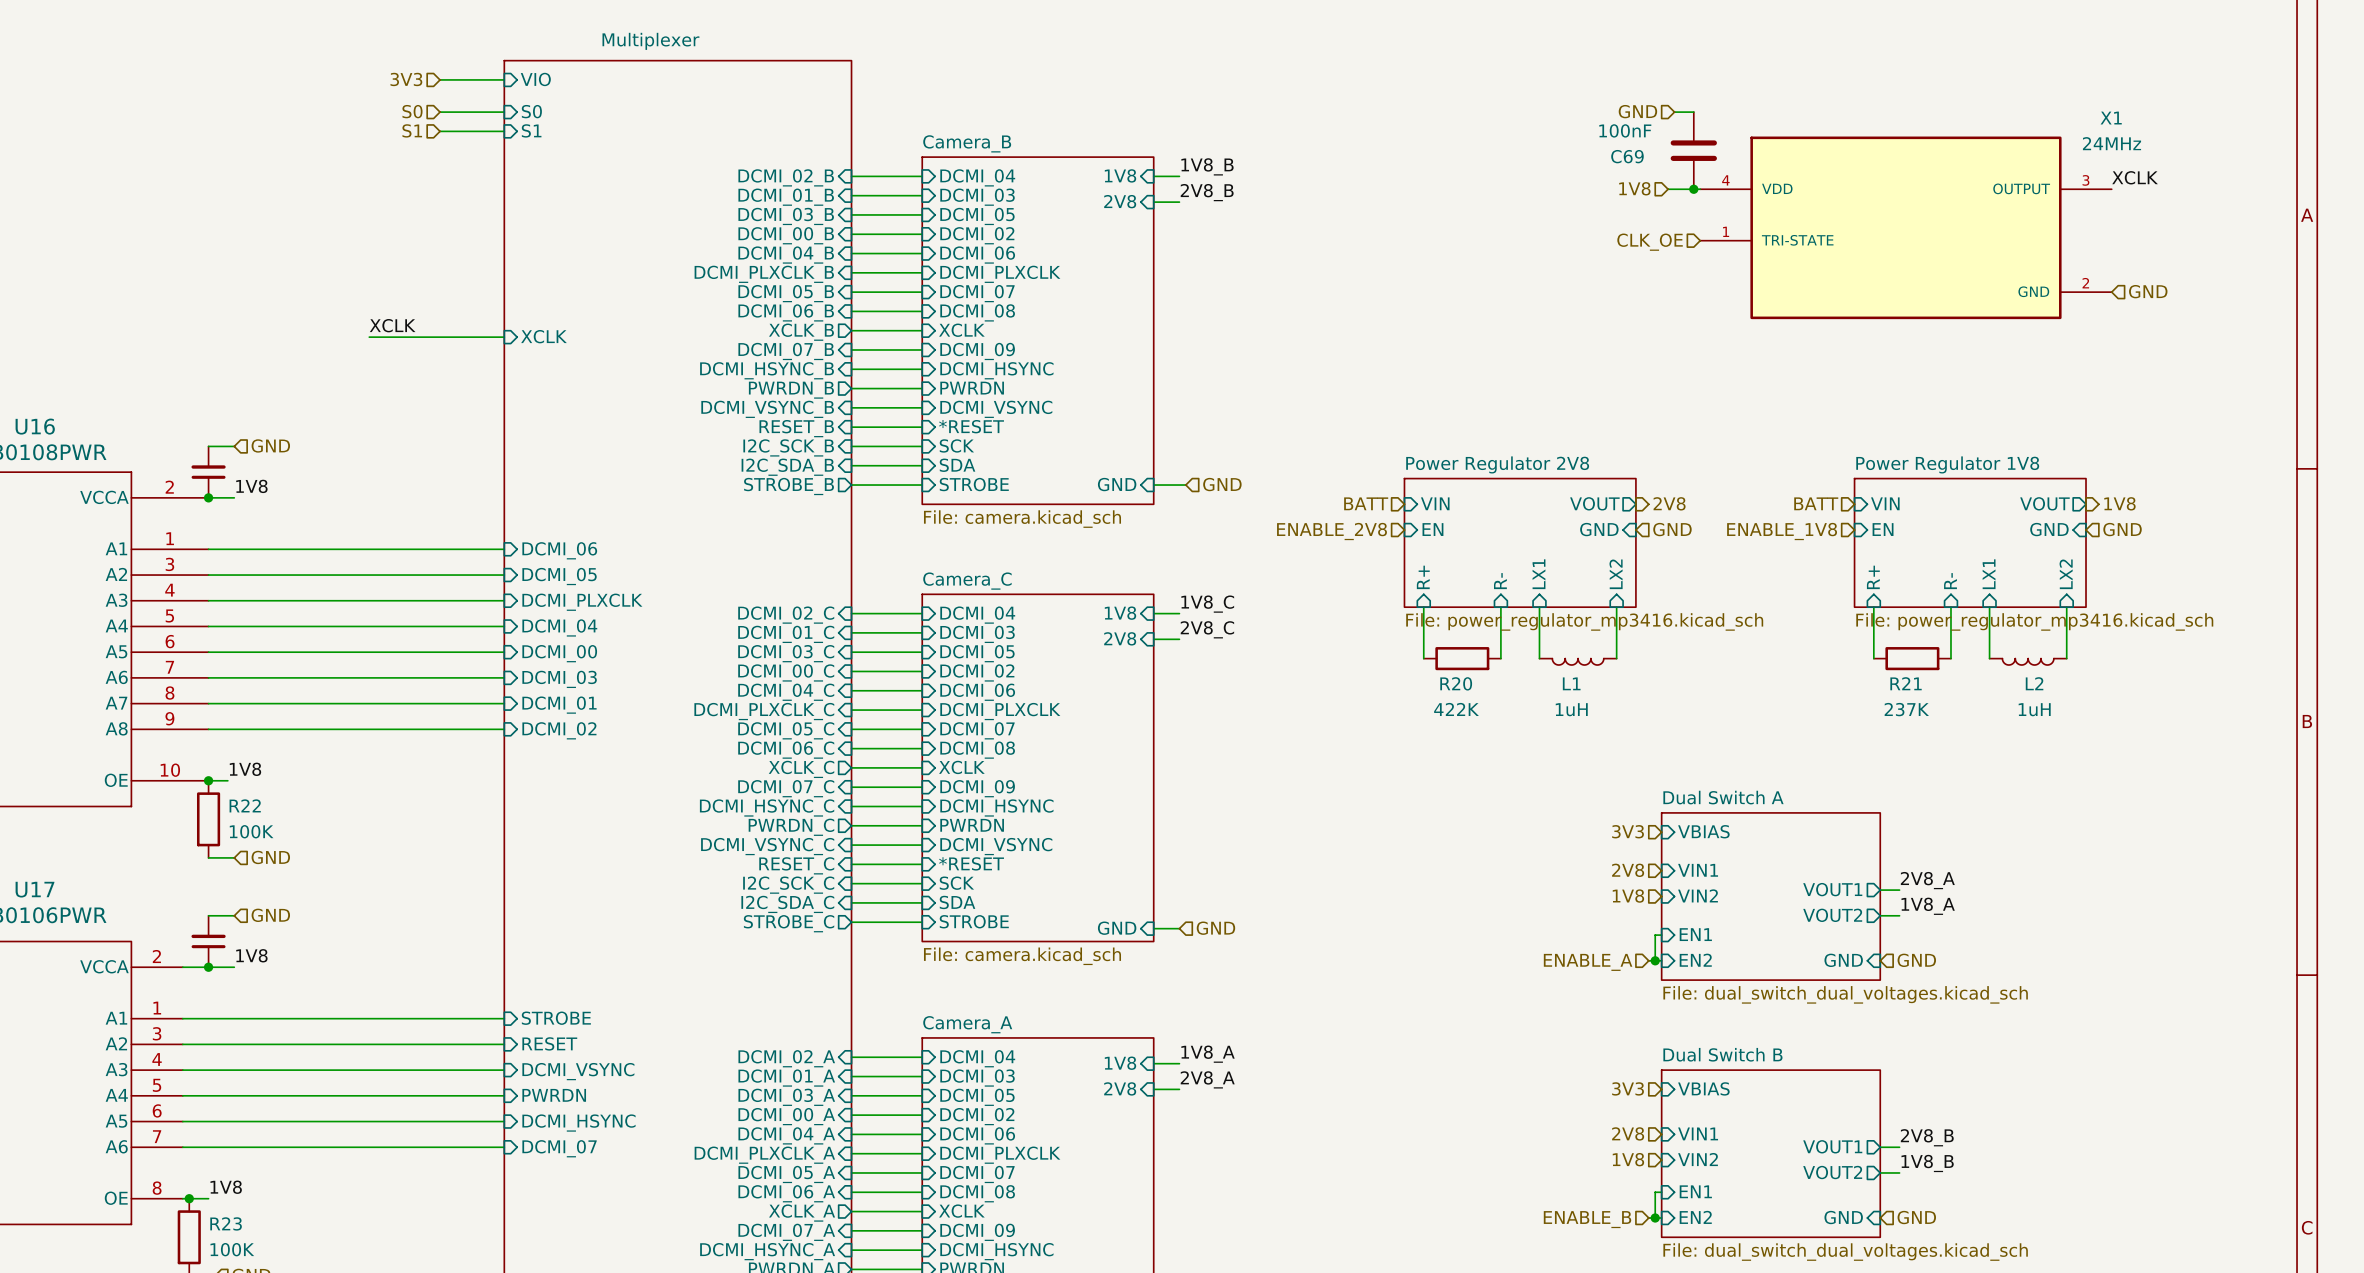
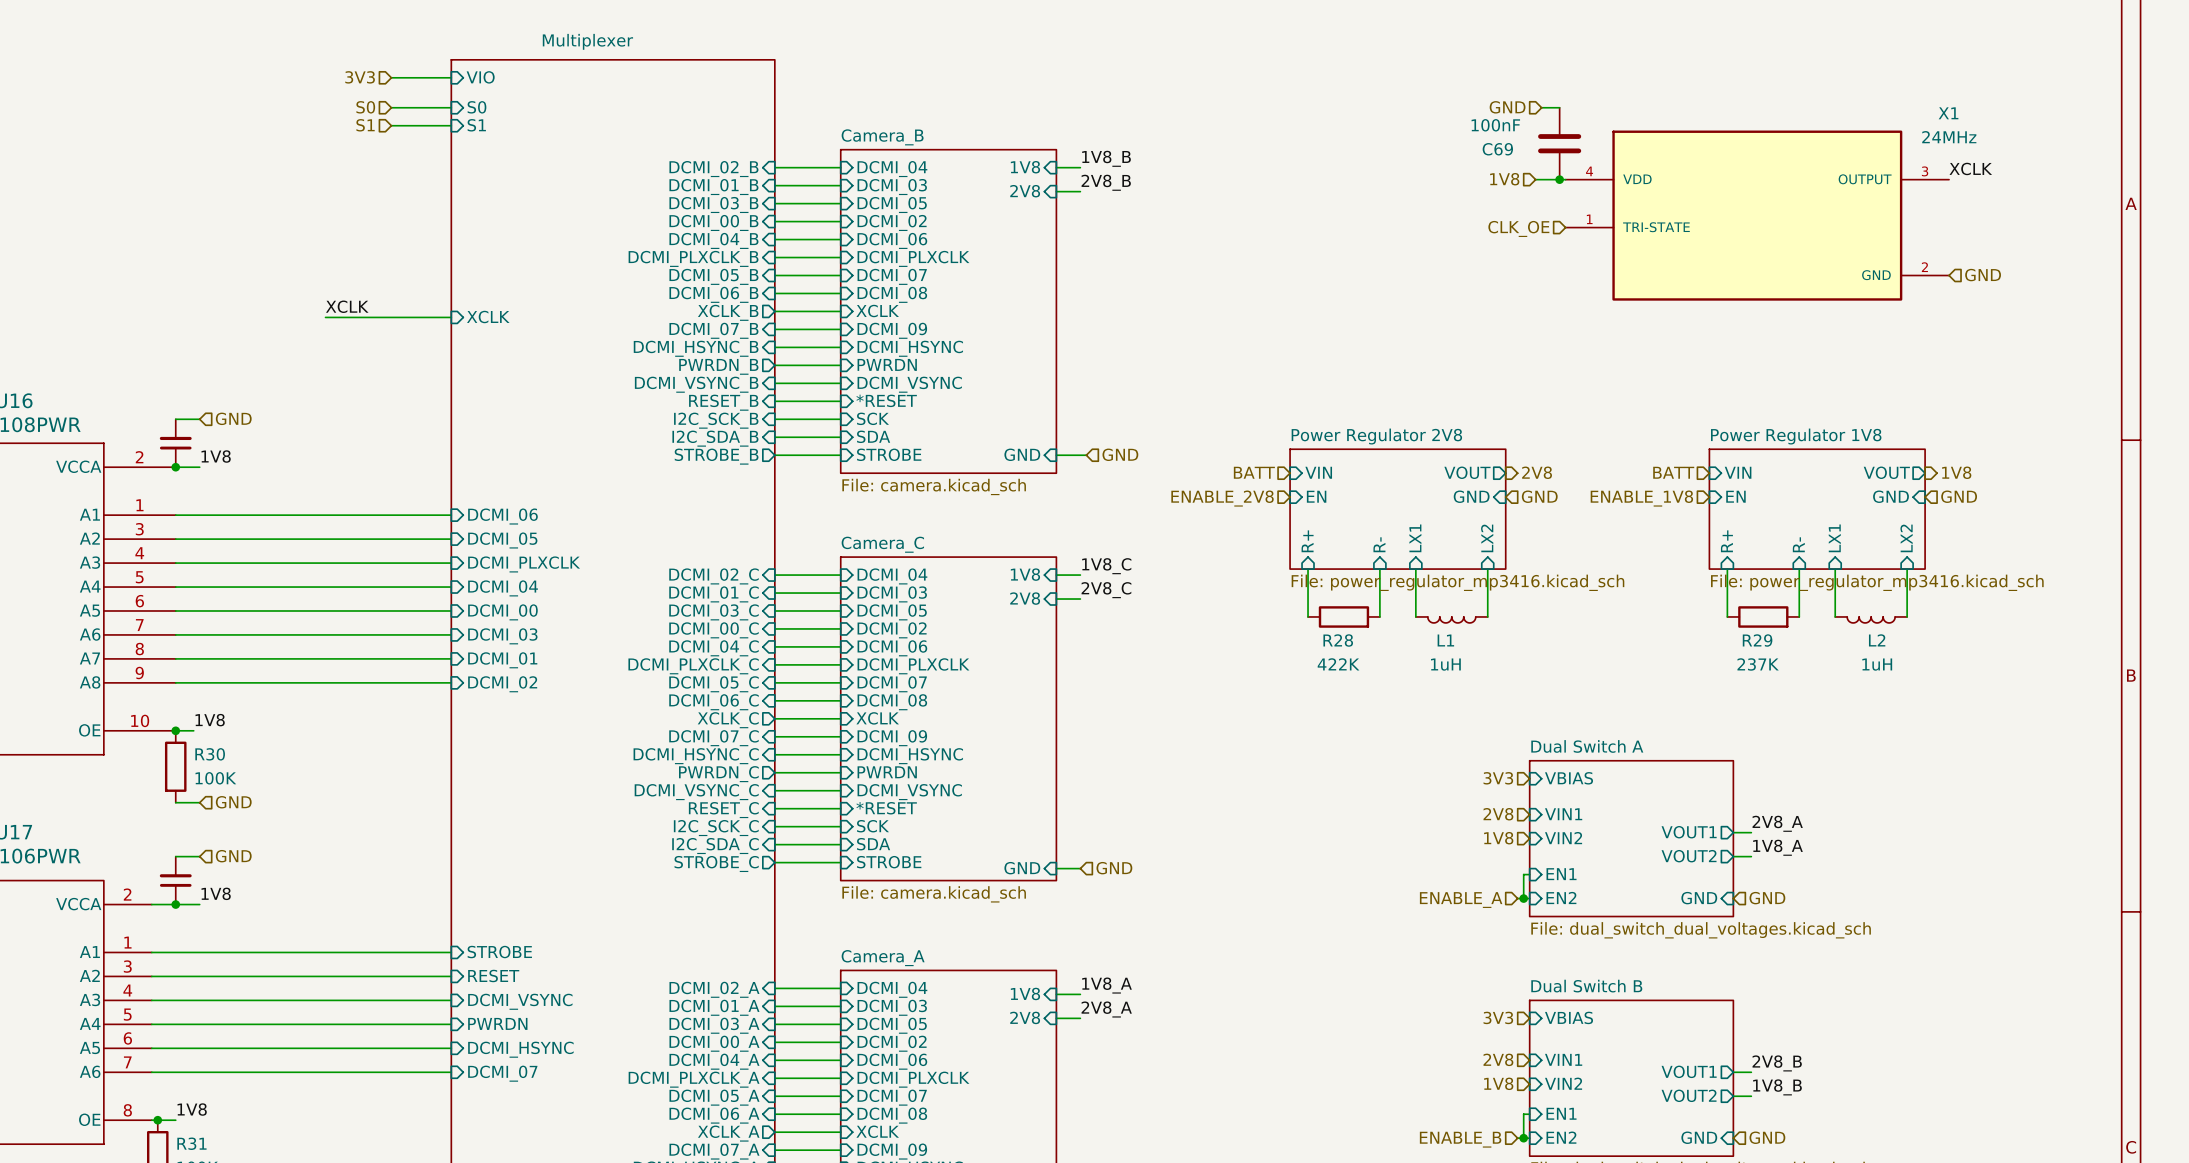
R20 name: R20 (1456, 683) -> R28 (1338, 640)
R21 name: R21 (1906, 683) -> R29 (1757, 640)
R22 name: R22 (245, 805) -> R30 (210, 754)
R23 name: R23 (226, 1223) -> R31 (191, 1143)

